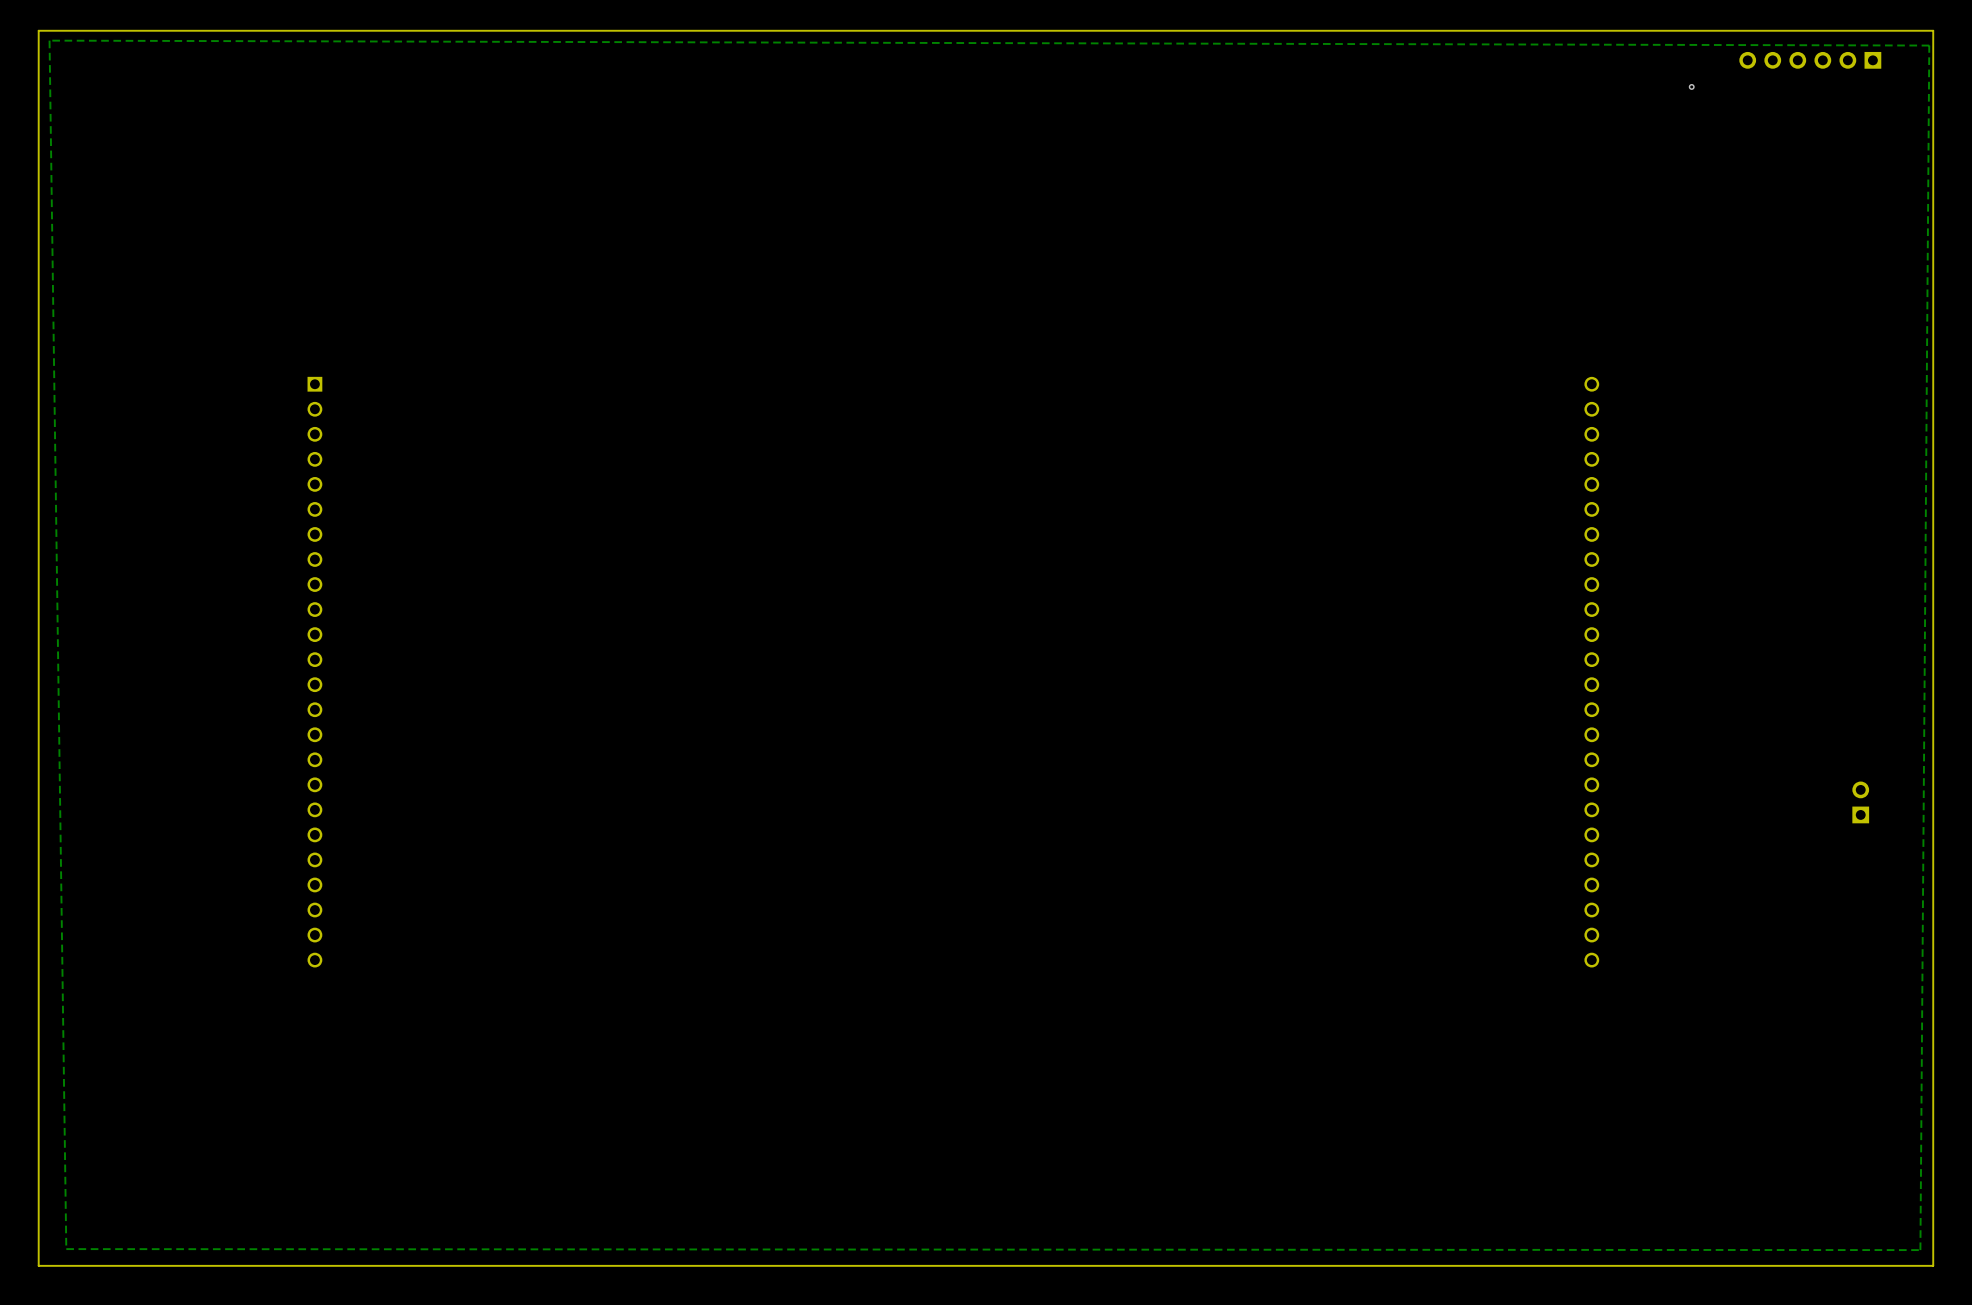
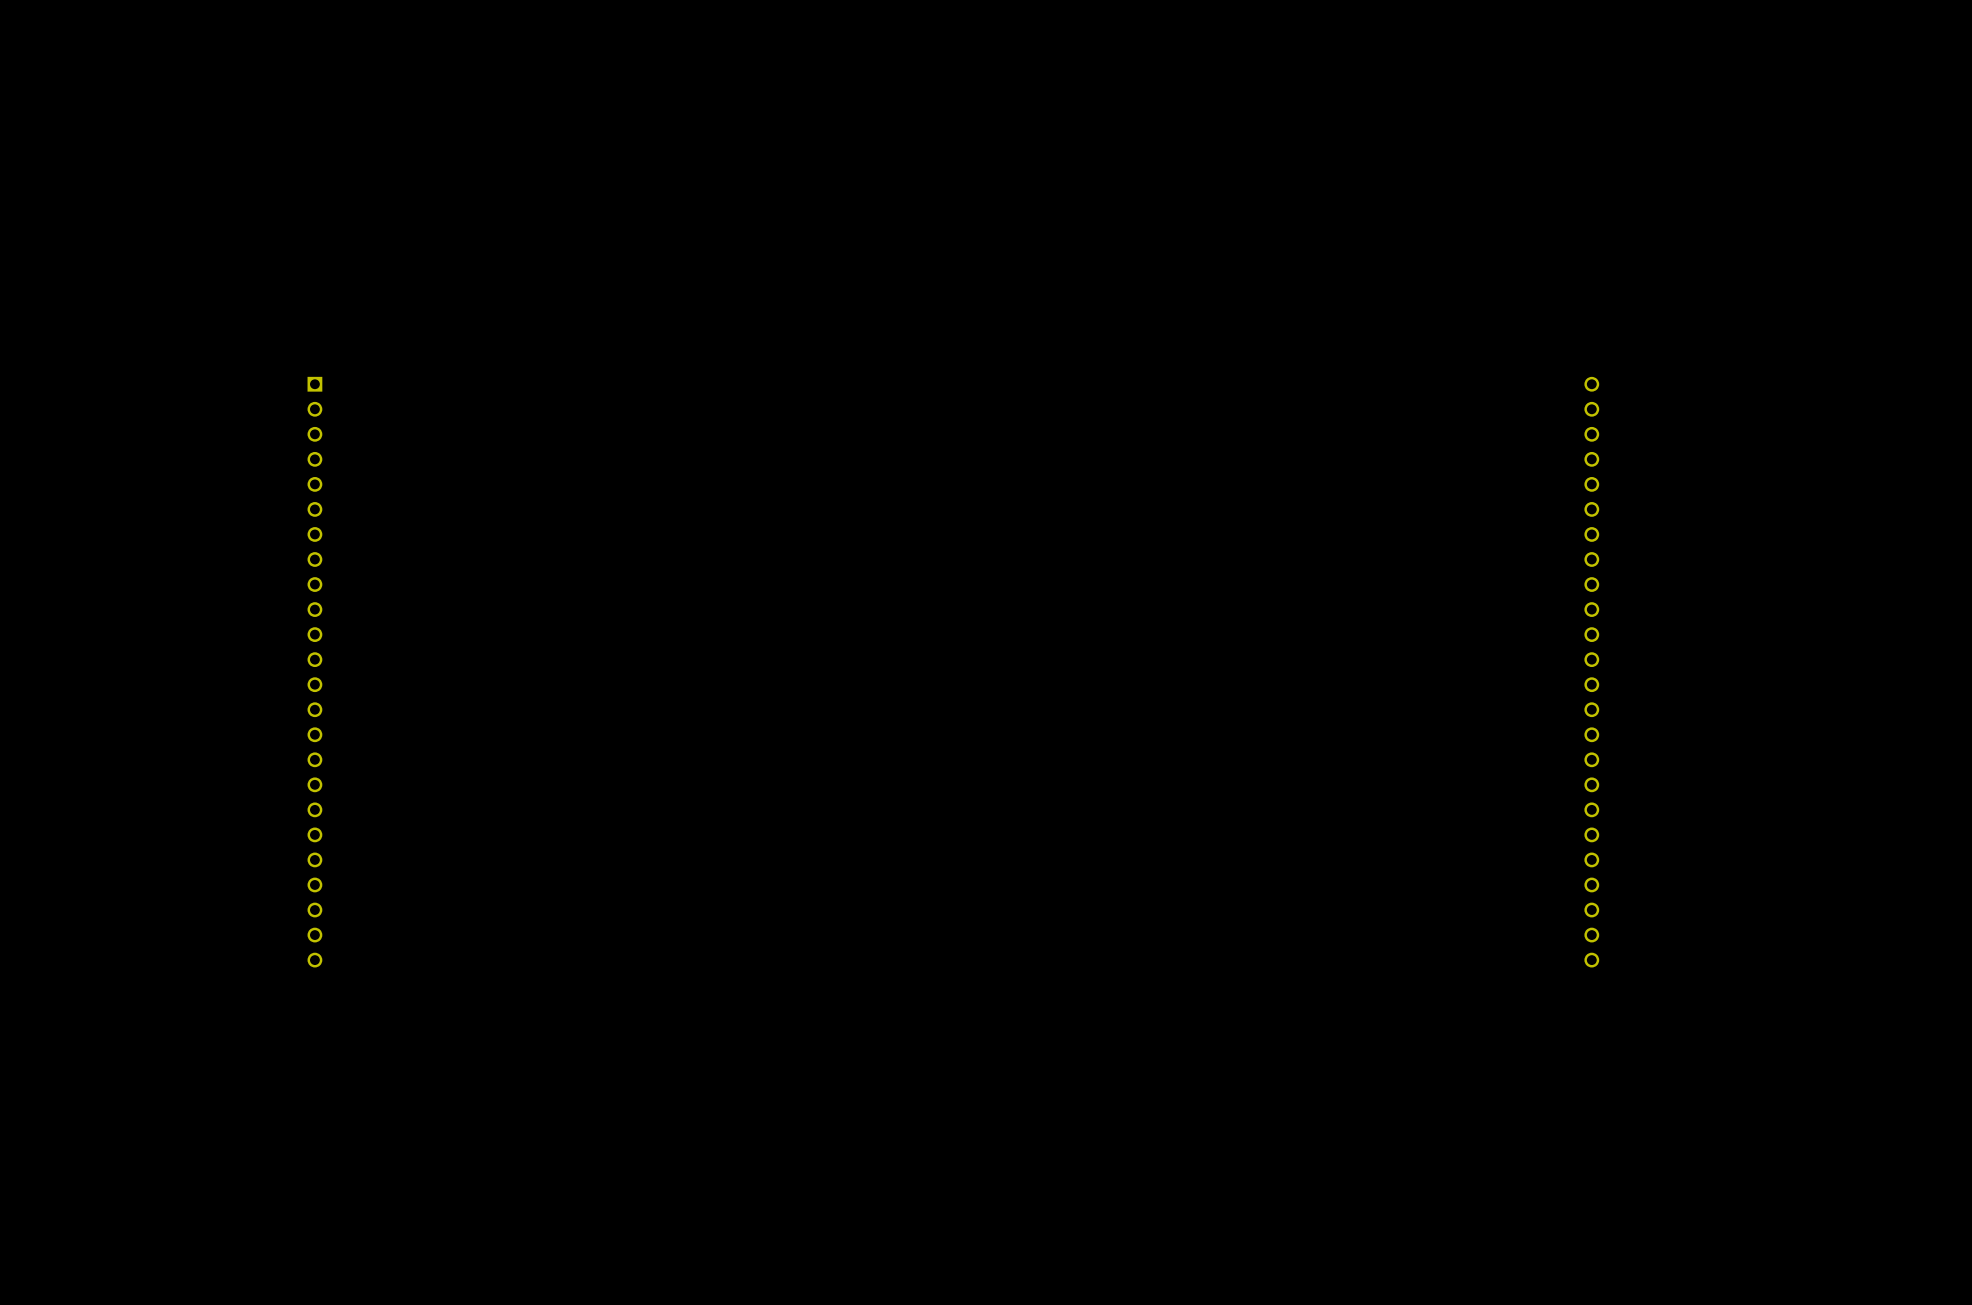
board edge: (1933, 30) (38, 30) (38, 1265) (1933, 1265) (1933, 30) -> none
zone outline: (49, 40) (1929, 45) (1920, 1250) (66, 1249) (49, 40) -> none
part: (1810, 60) -> none
via: (1691, 86) -> none
part: (1860, 802) -> none

